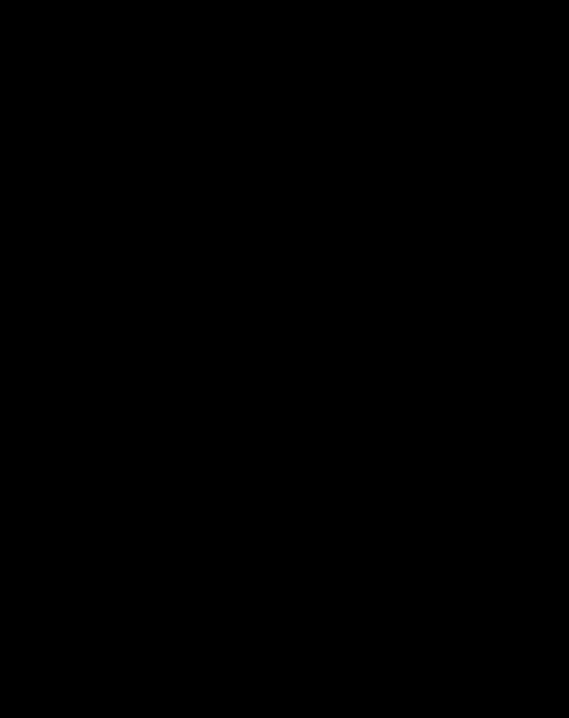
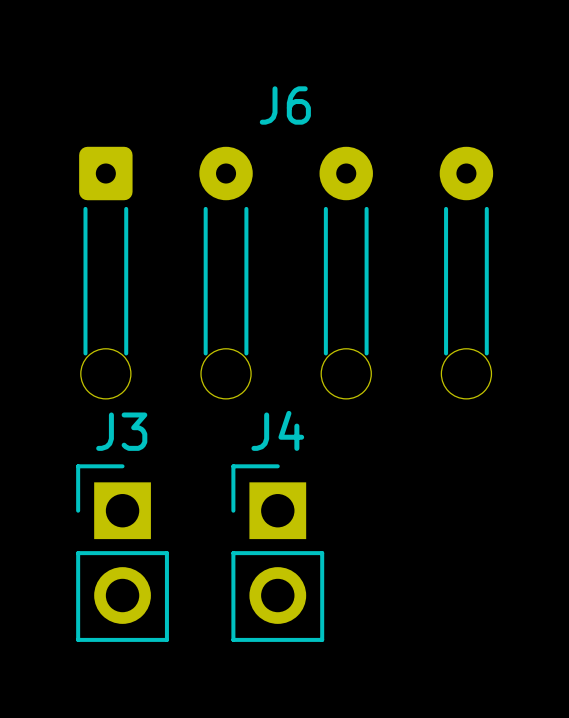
J6: none -> (286, 272)
J3: none -> (122, 553)
J4: none -> (277, 553)

